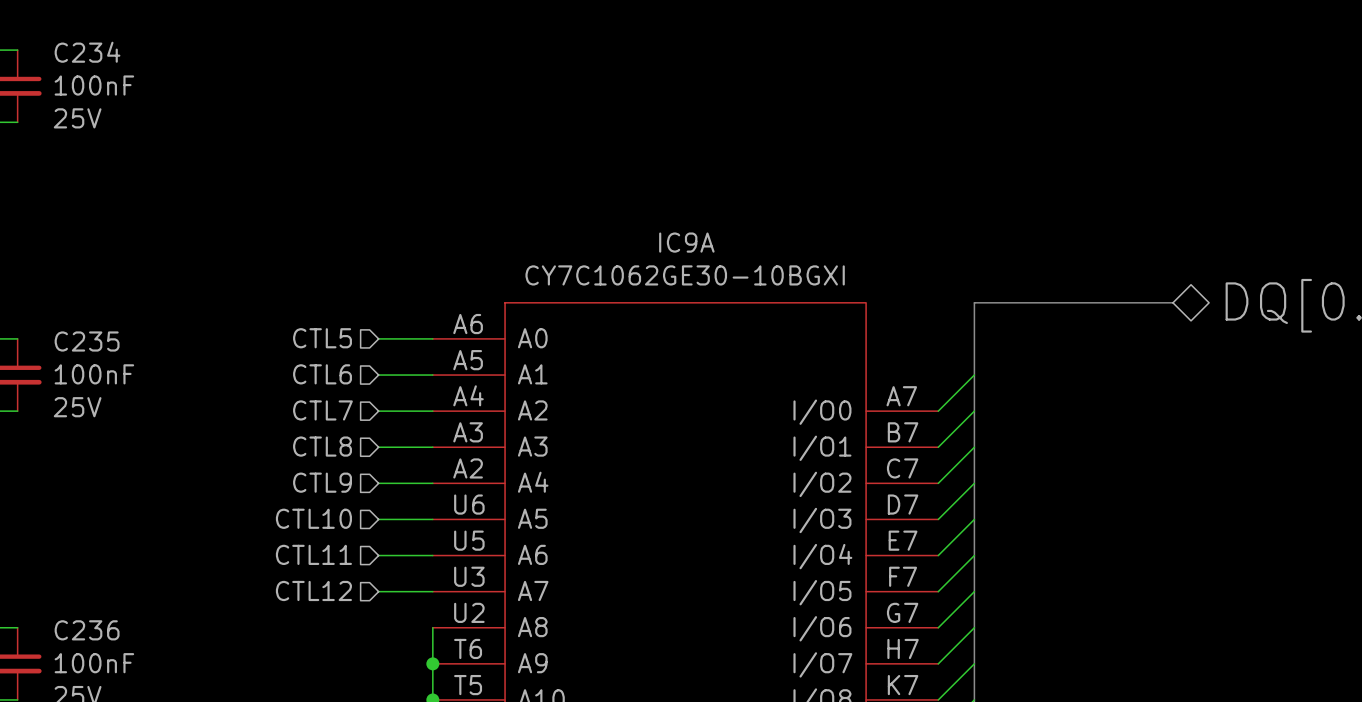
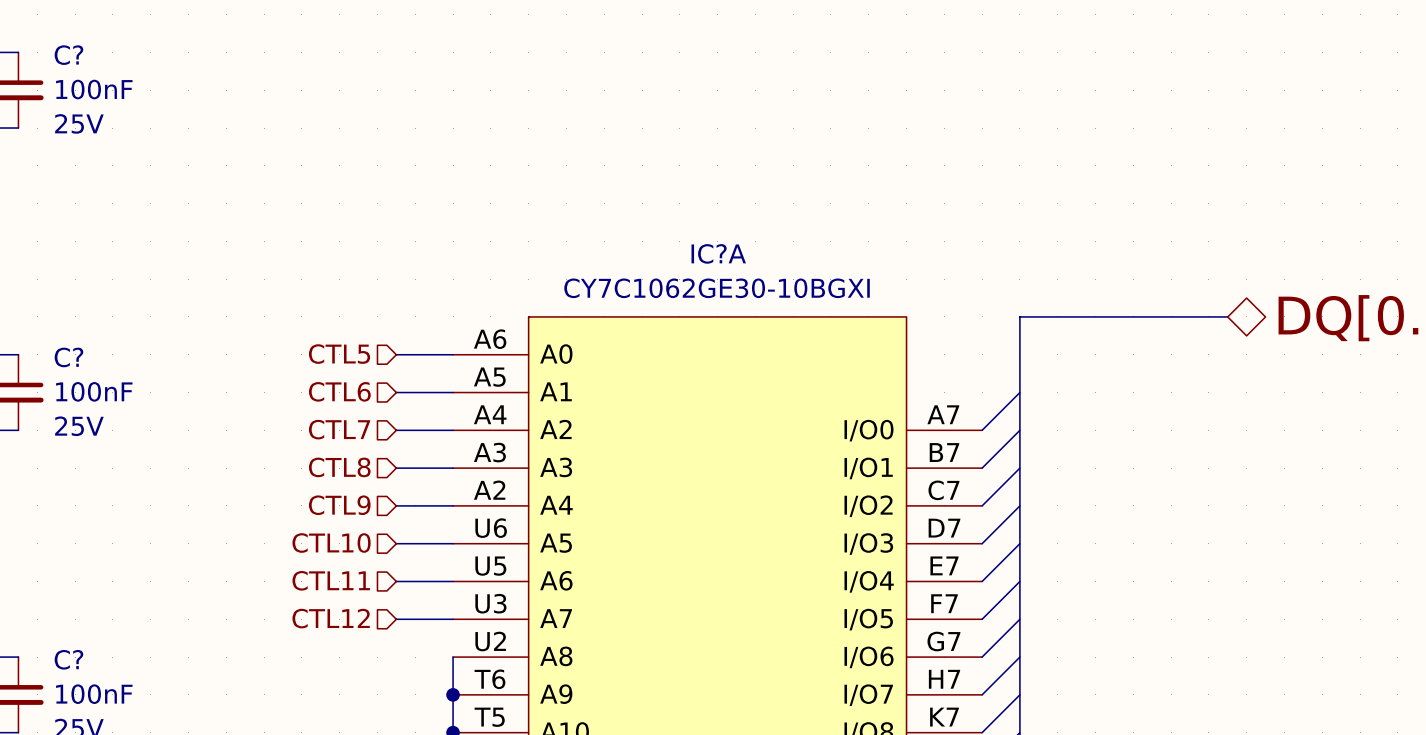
C234 name: C234 (87, 52) -> C? (68, 55)
IC9A name: IC9A (686, 242) -> IC?A (718, 253)
C235 name: C235 (87, 341) -> C? (68, 357)
C236 name: C236 (87, 630) -> C? (68, 659)

